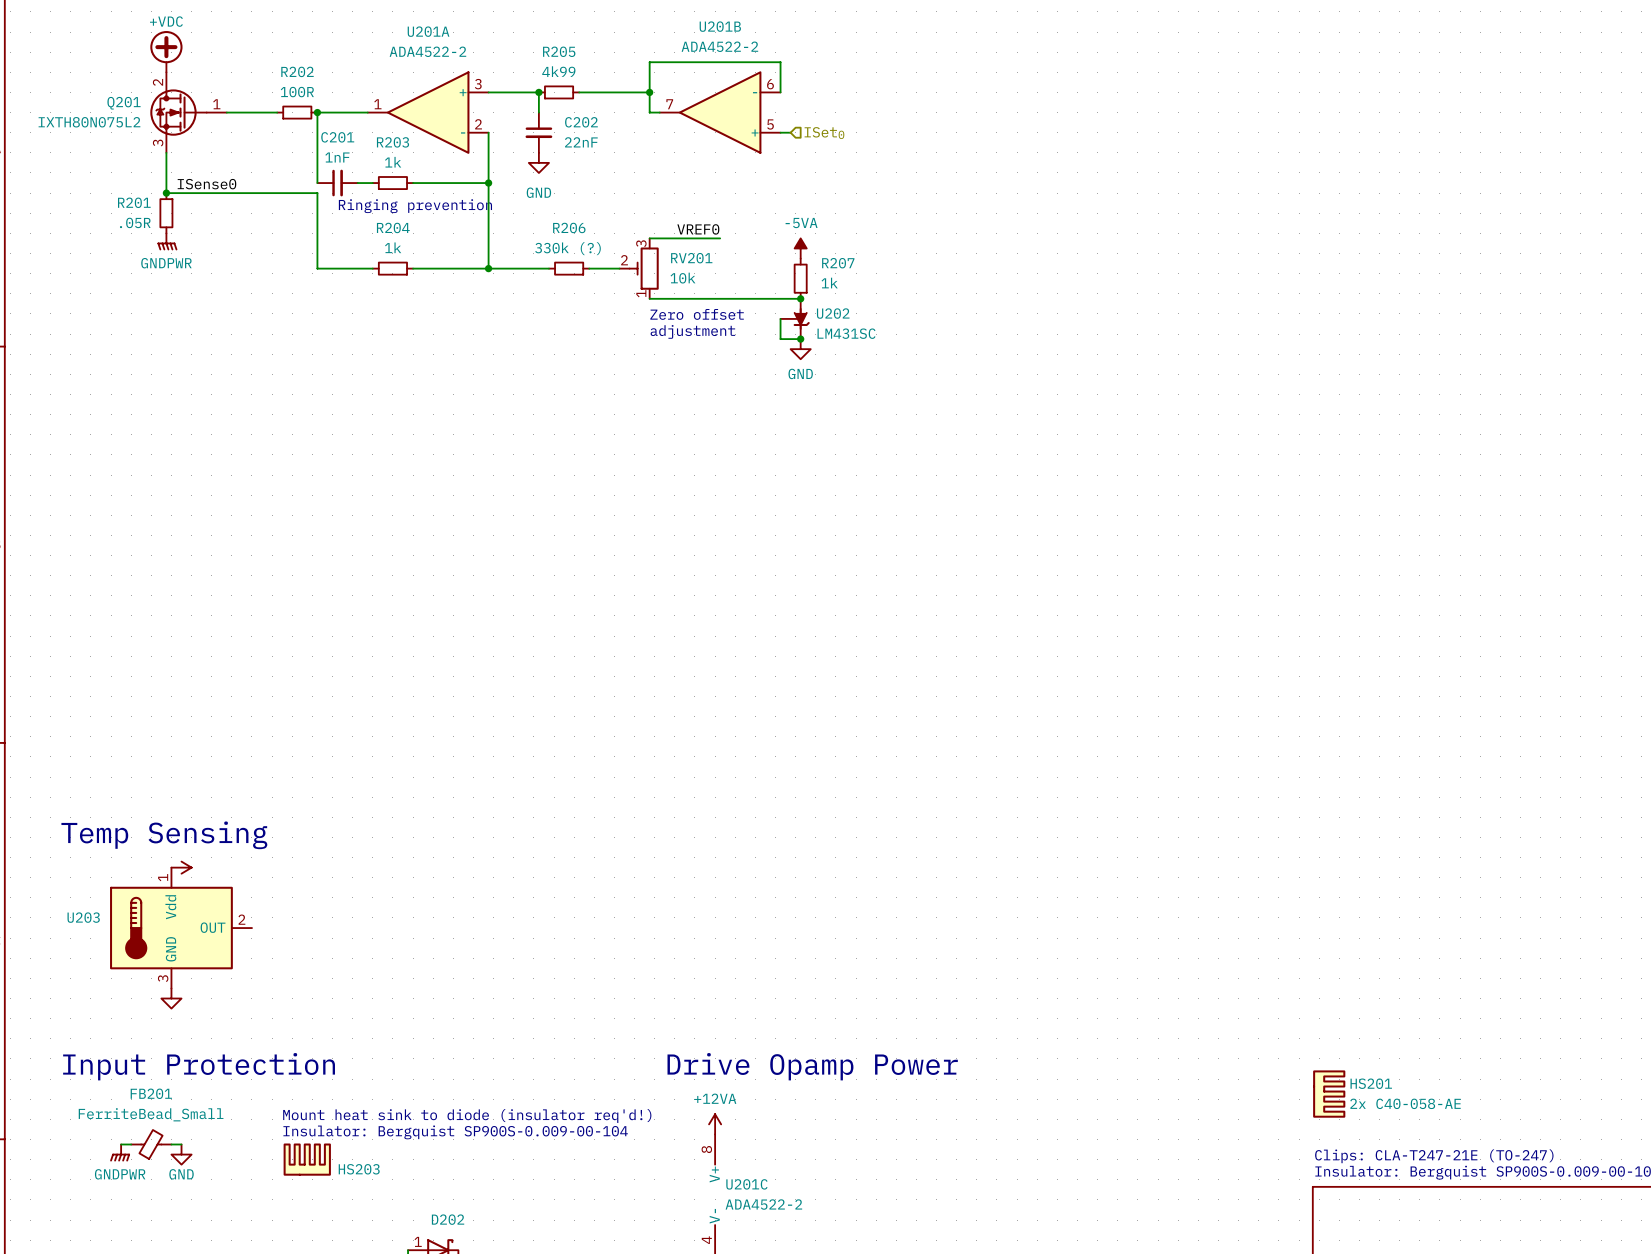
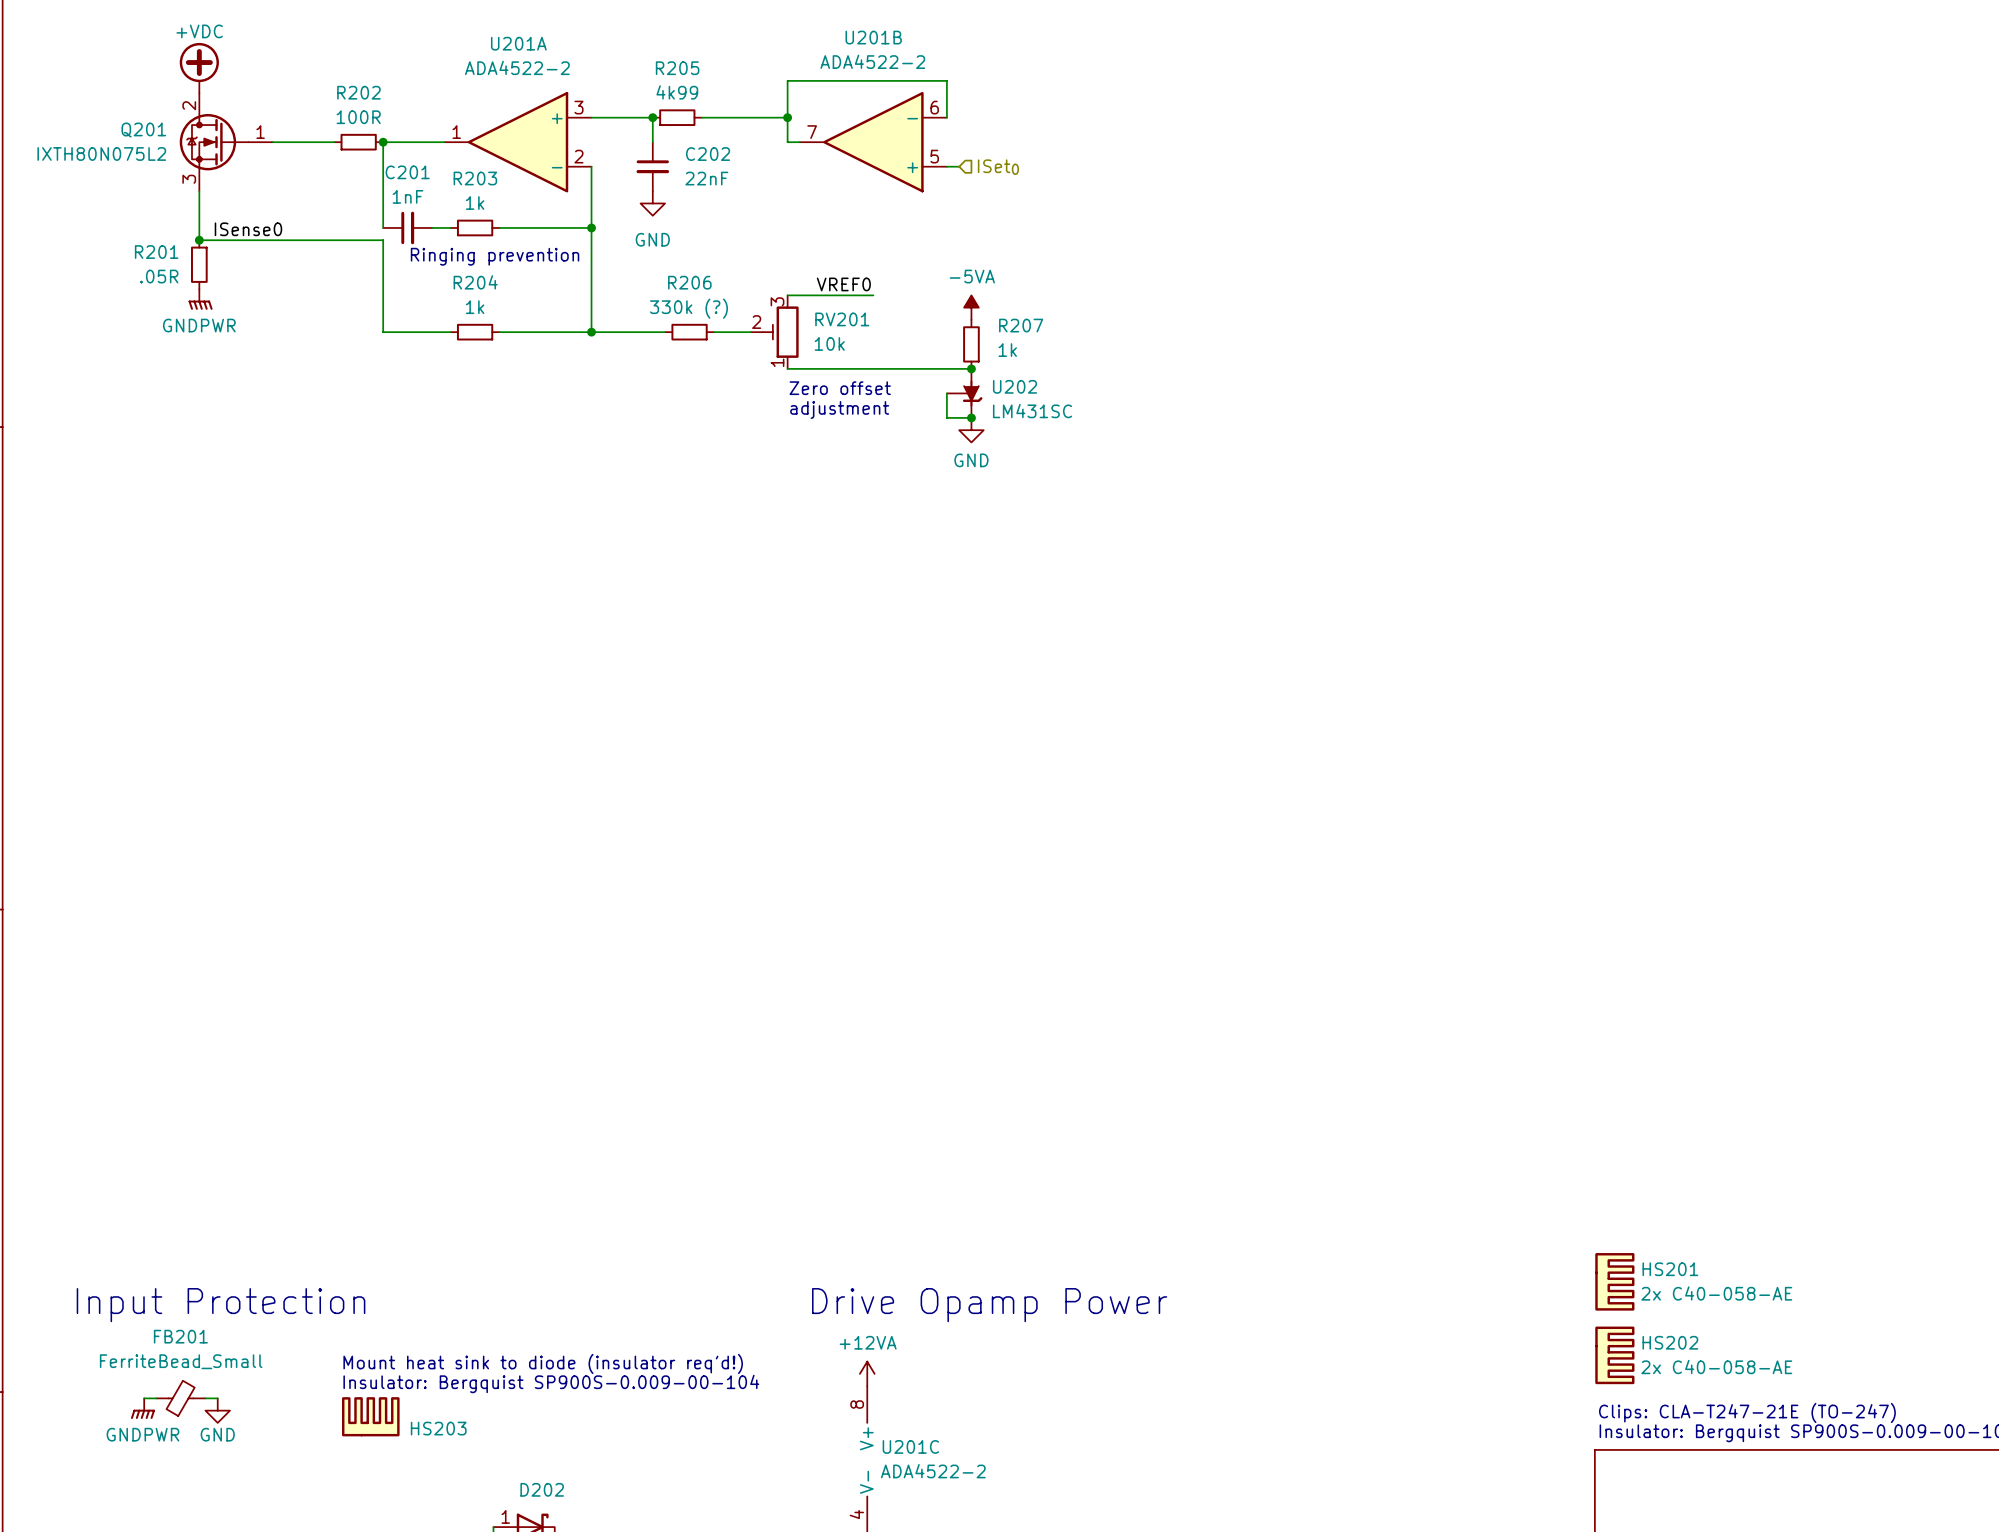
text: Temp Sensing (164, 835) -> none
power symbol: (181, 867) -> none
U203: (181, 928) -> none
power symbol: (171, 998) -> none
HS201 position: (1329, 1094) -> (1614, 1281)
HS202: none -> 2x C40-058-AE (1614, 1355)

